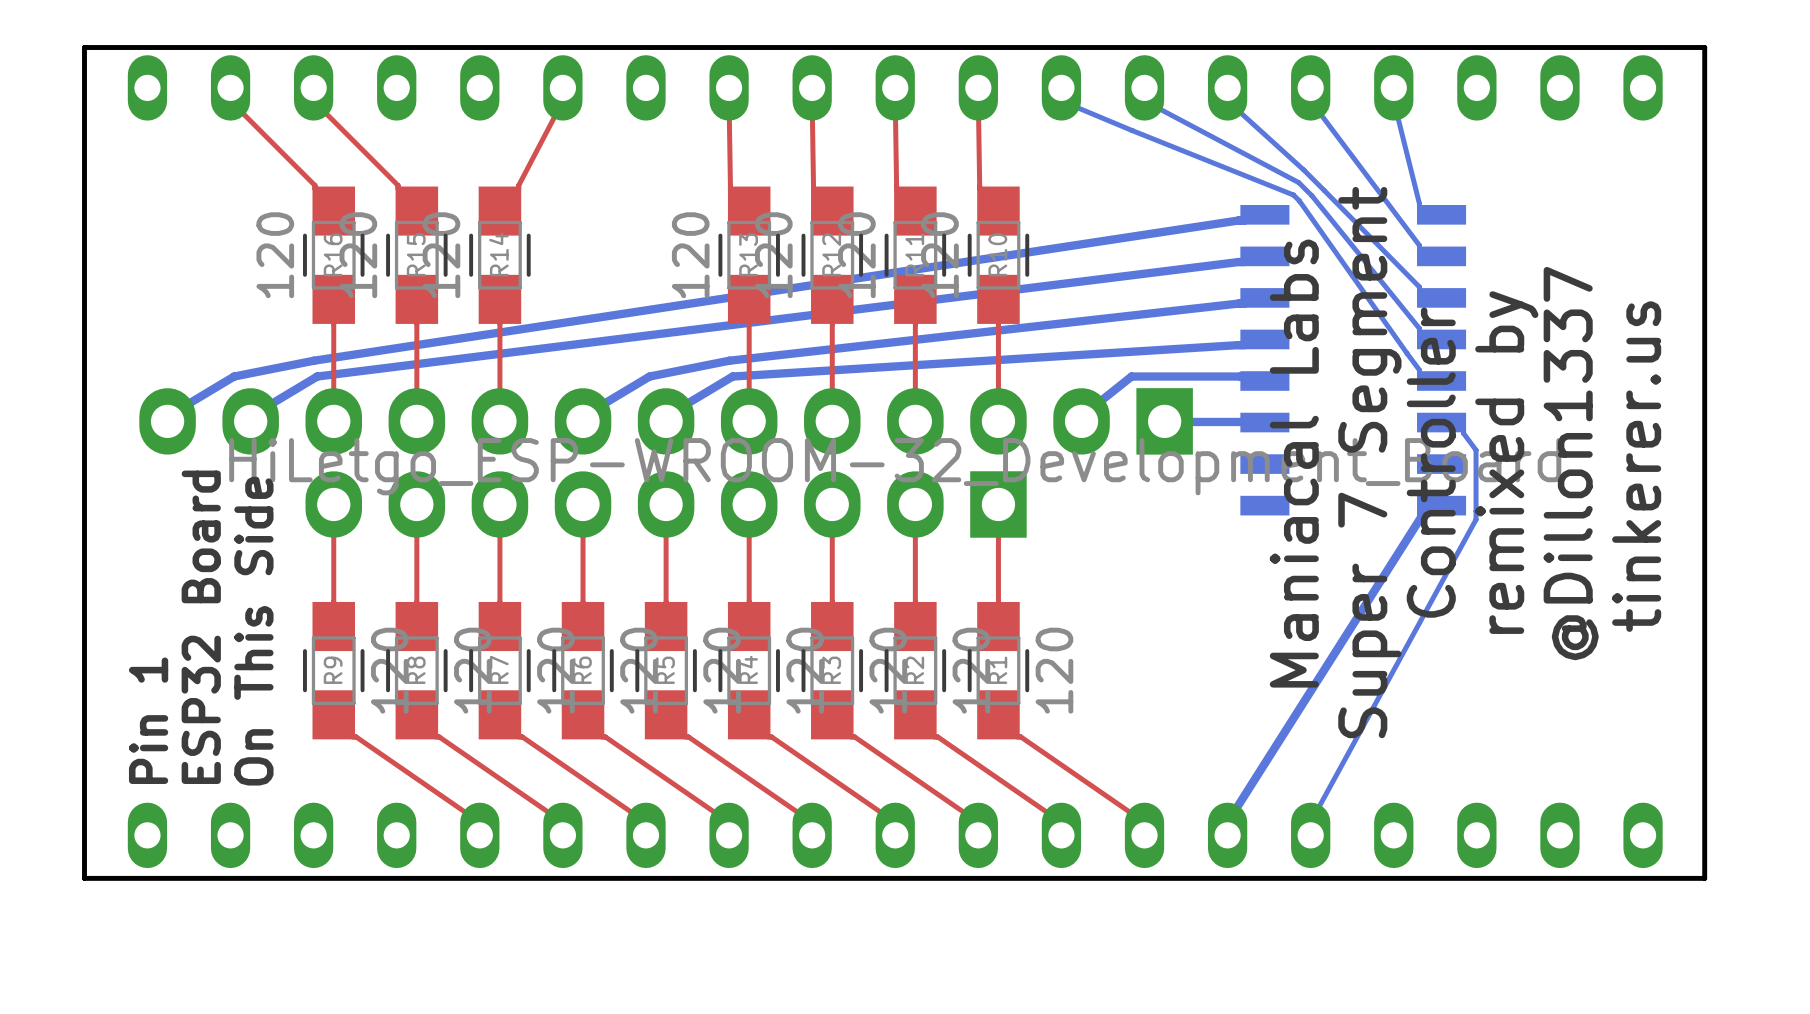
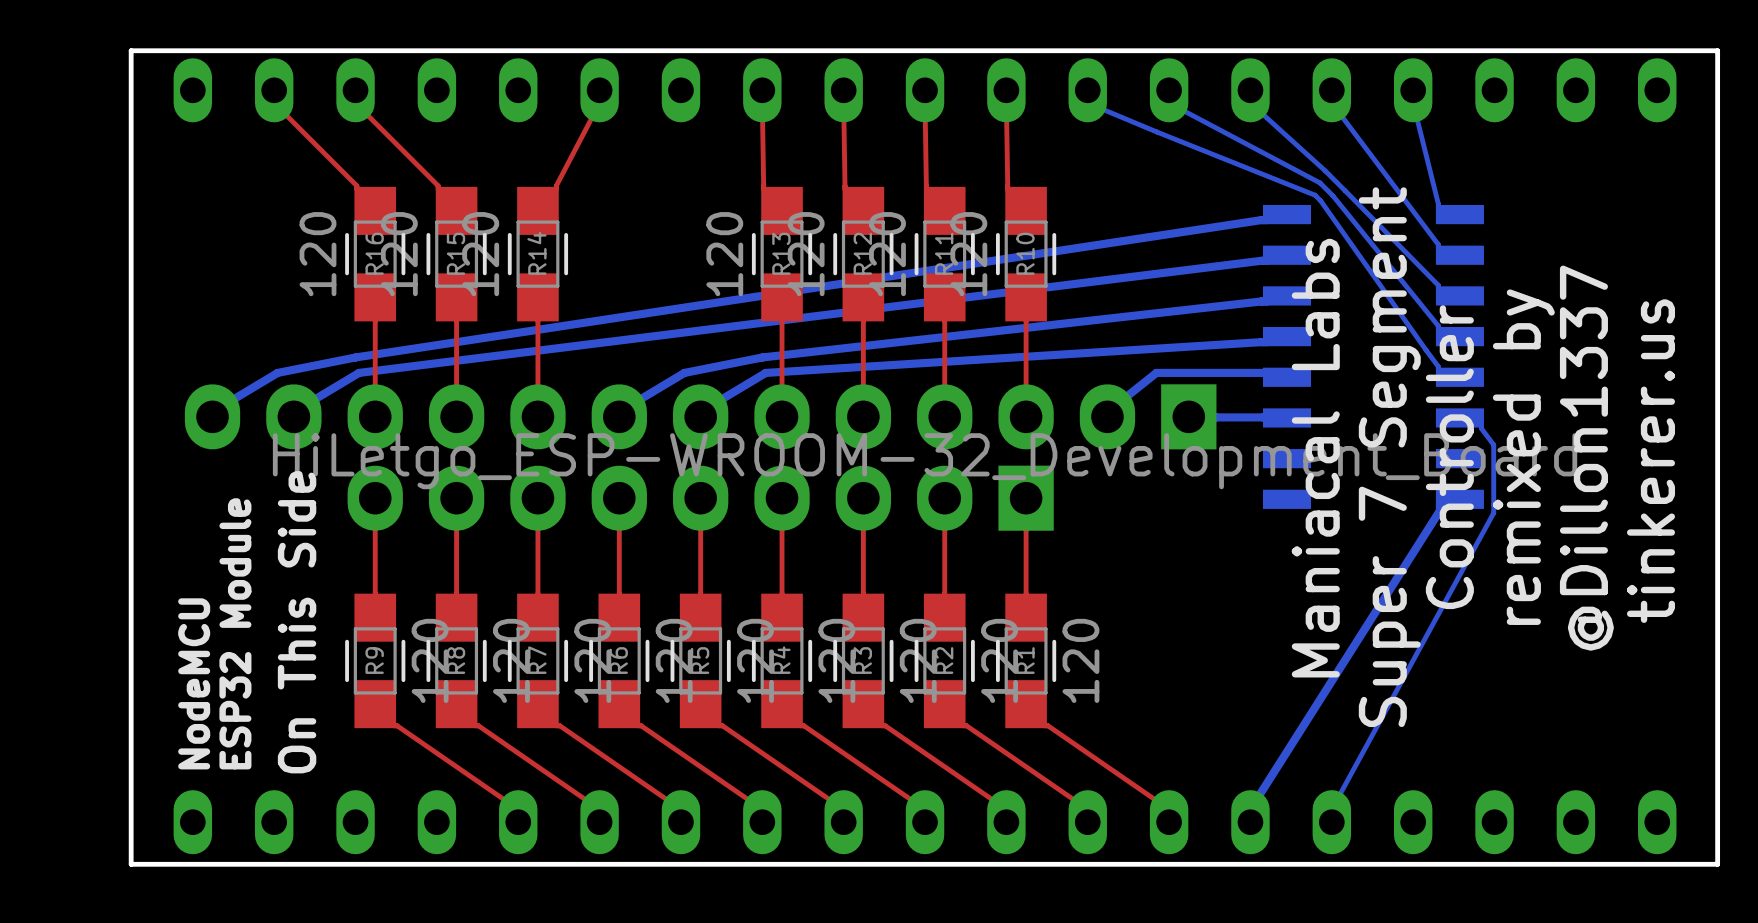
text: ESP32 Board (201, 627) -> ESP32 Module (235, 633)
text: Pin 1 (148, 720) -> NodeMCU (194, 683)

